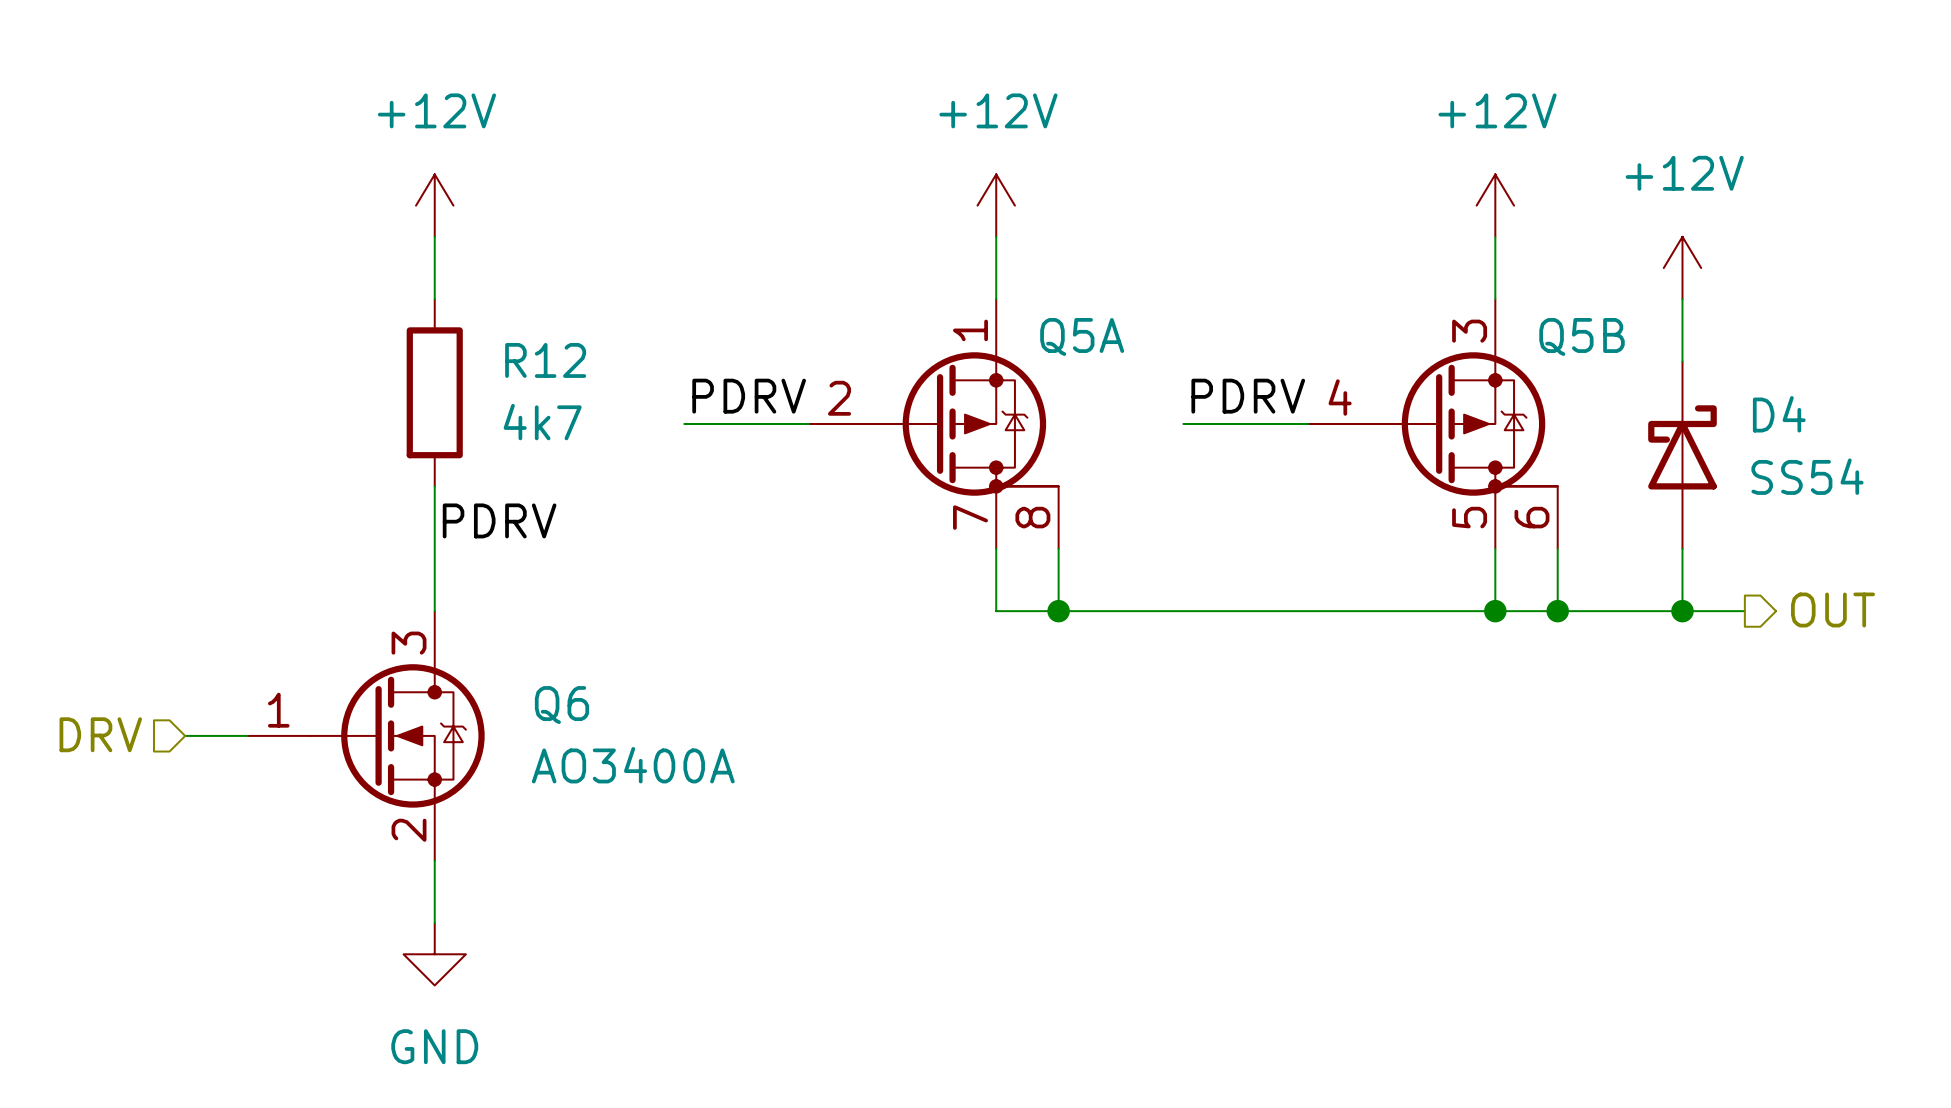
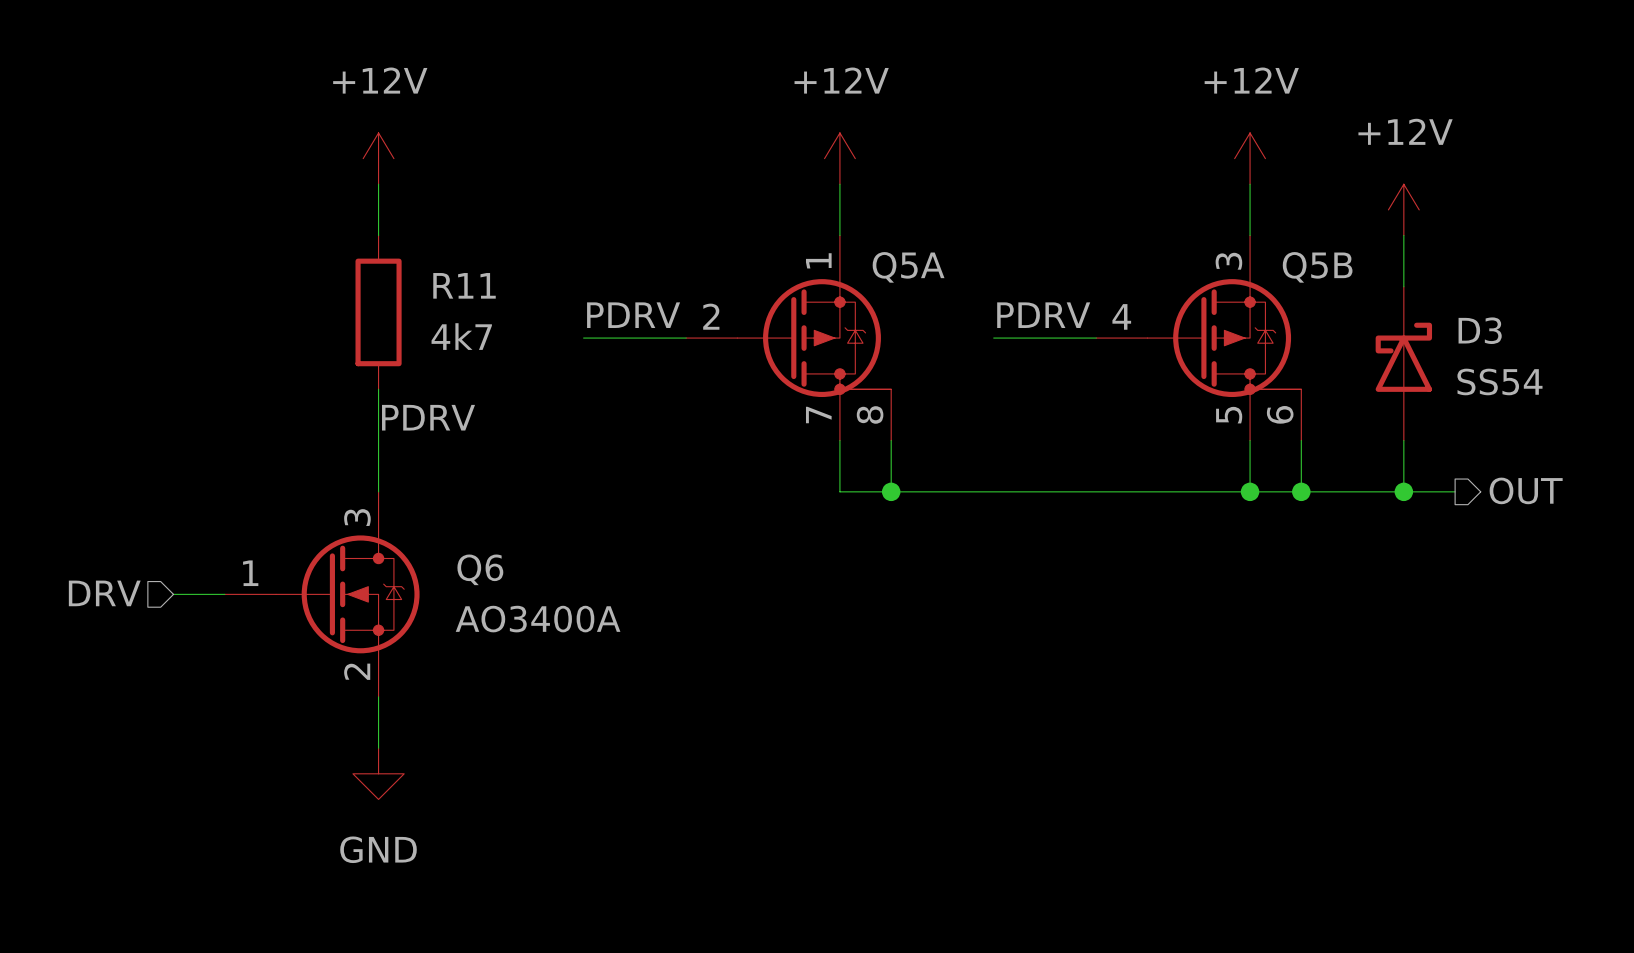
R12 name: R12 (545, 360) -> R11 (464, 285)
D4 name: D4 (1779, 414) -> D3 (1480, 330)

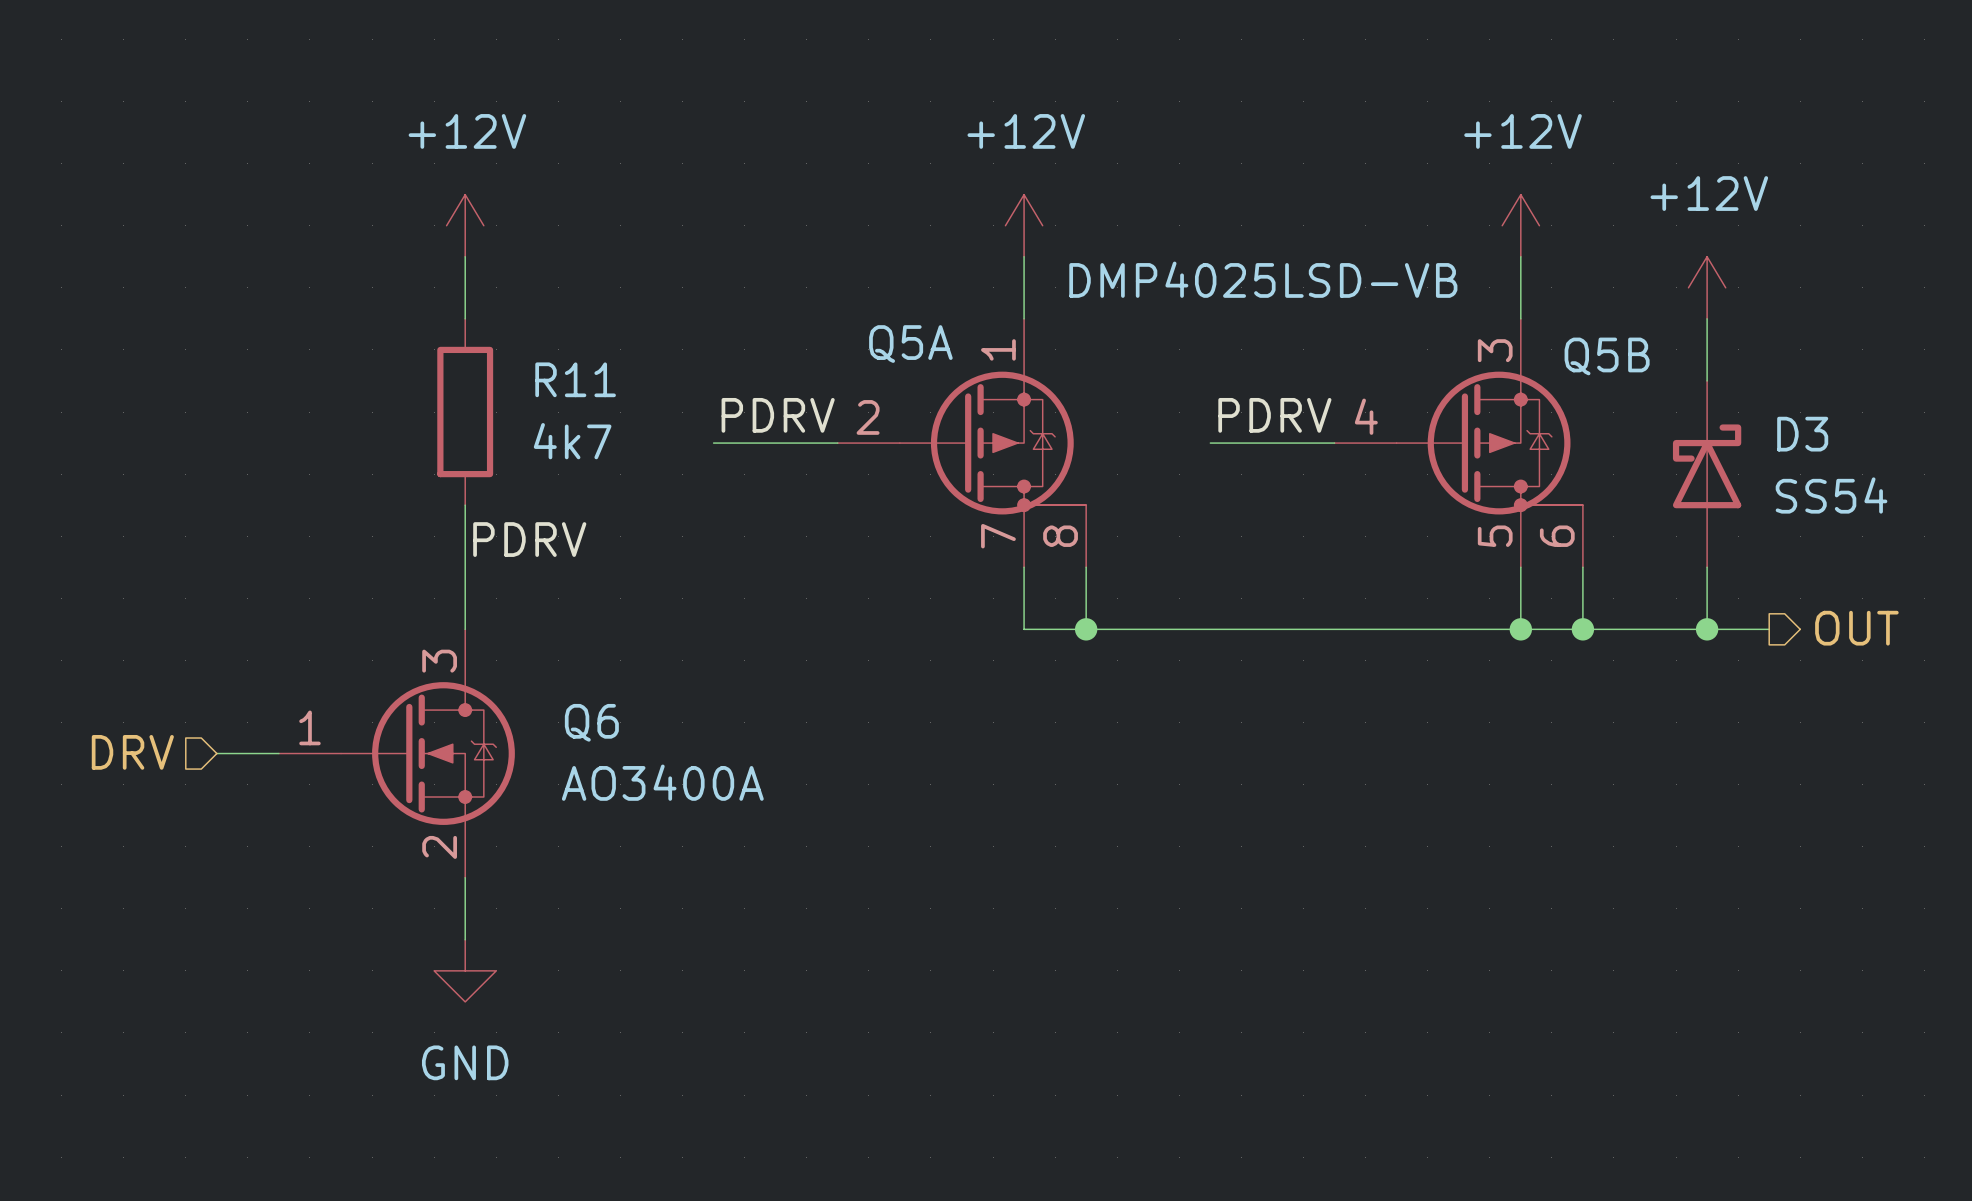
Q5A value: none -> DMP4025LSD-VB (1263, 279)
Q5A name position: Q5A (908, 267) -> Q5A (910, 344)

